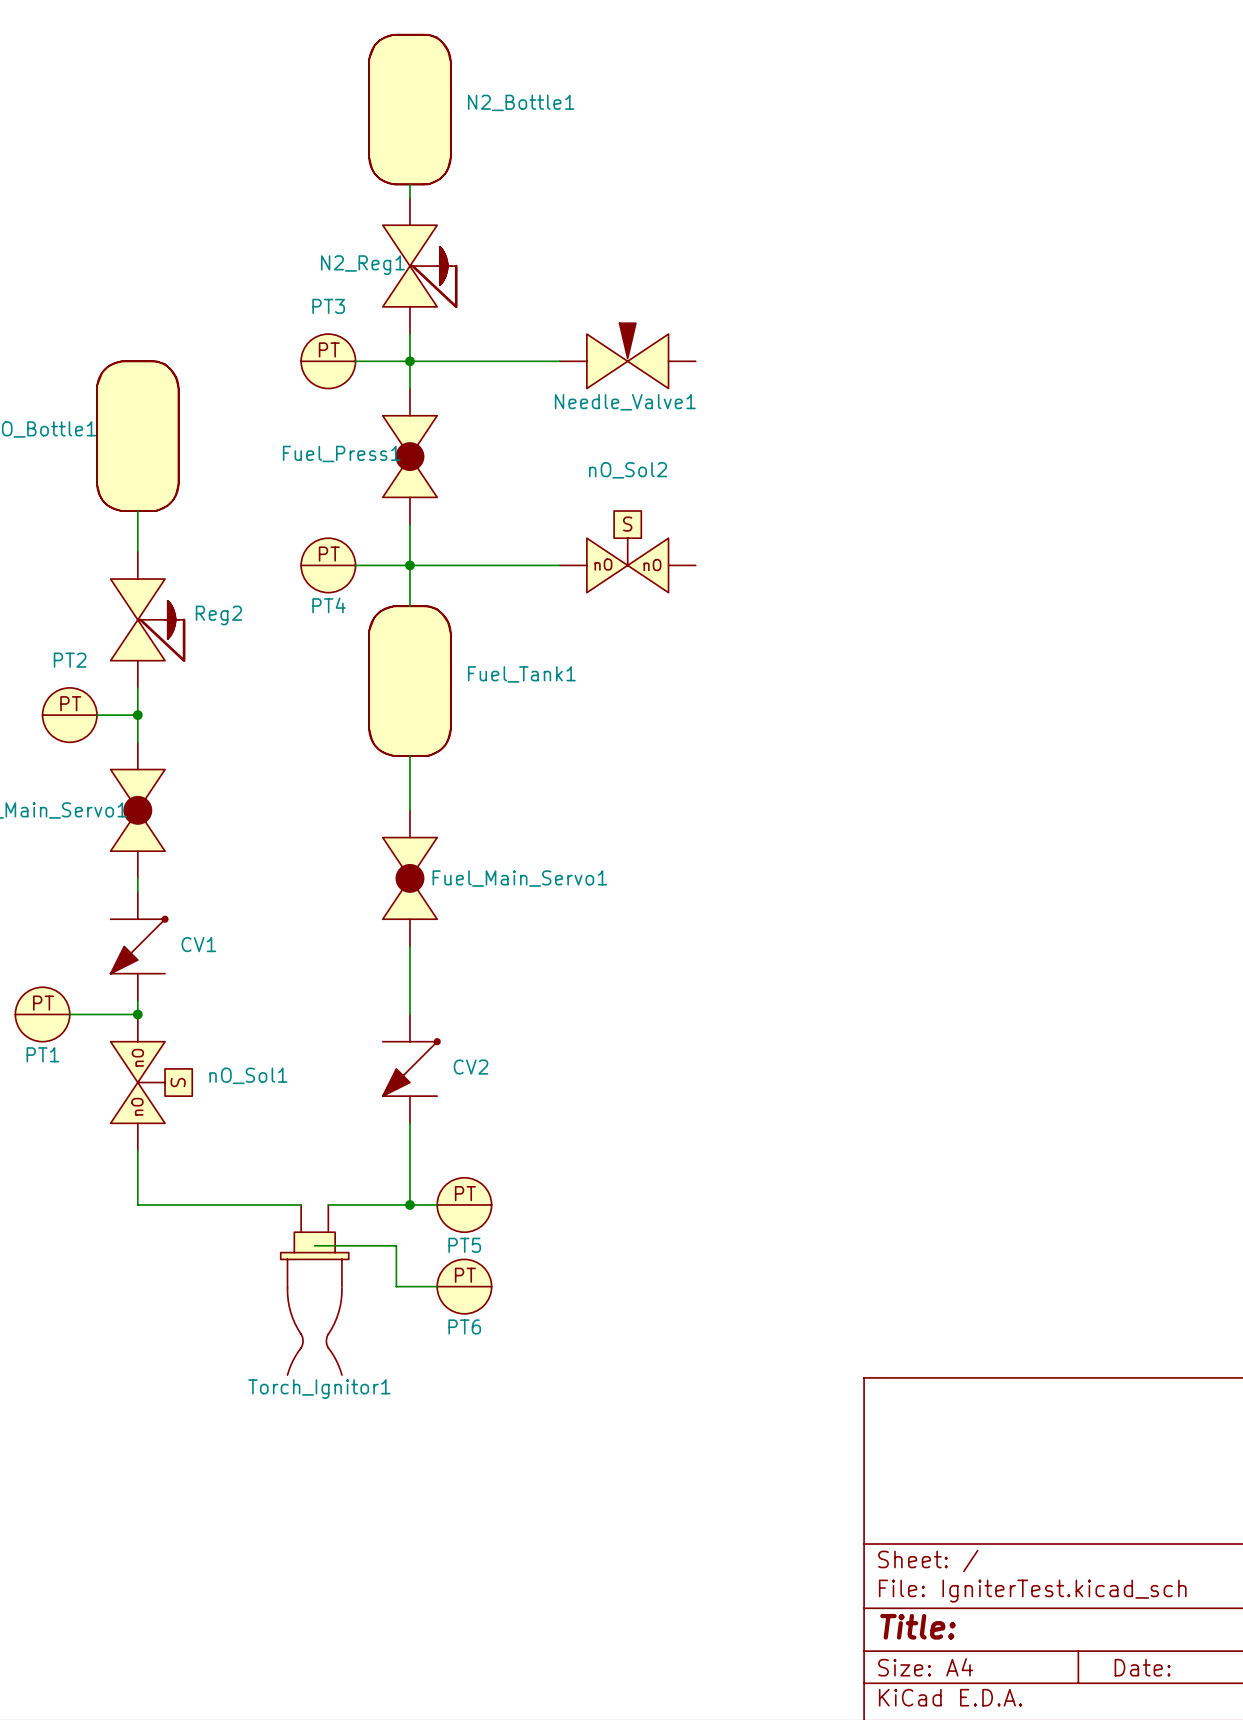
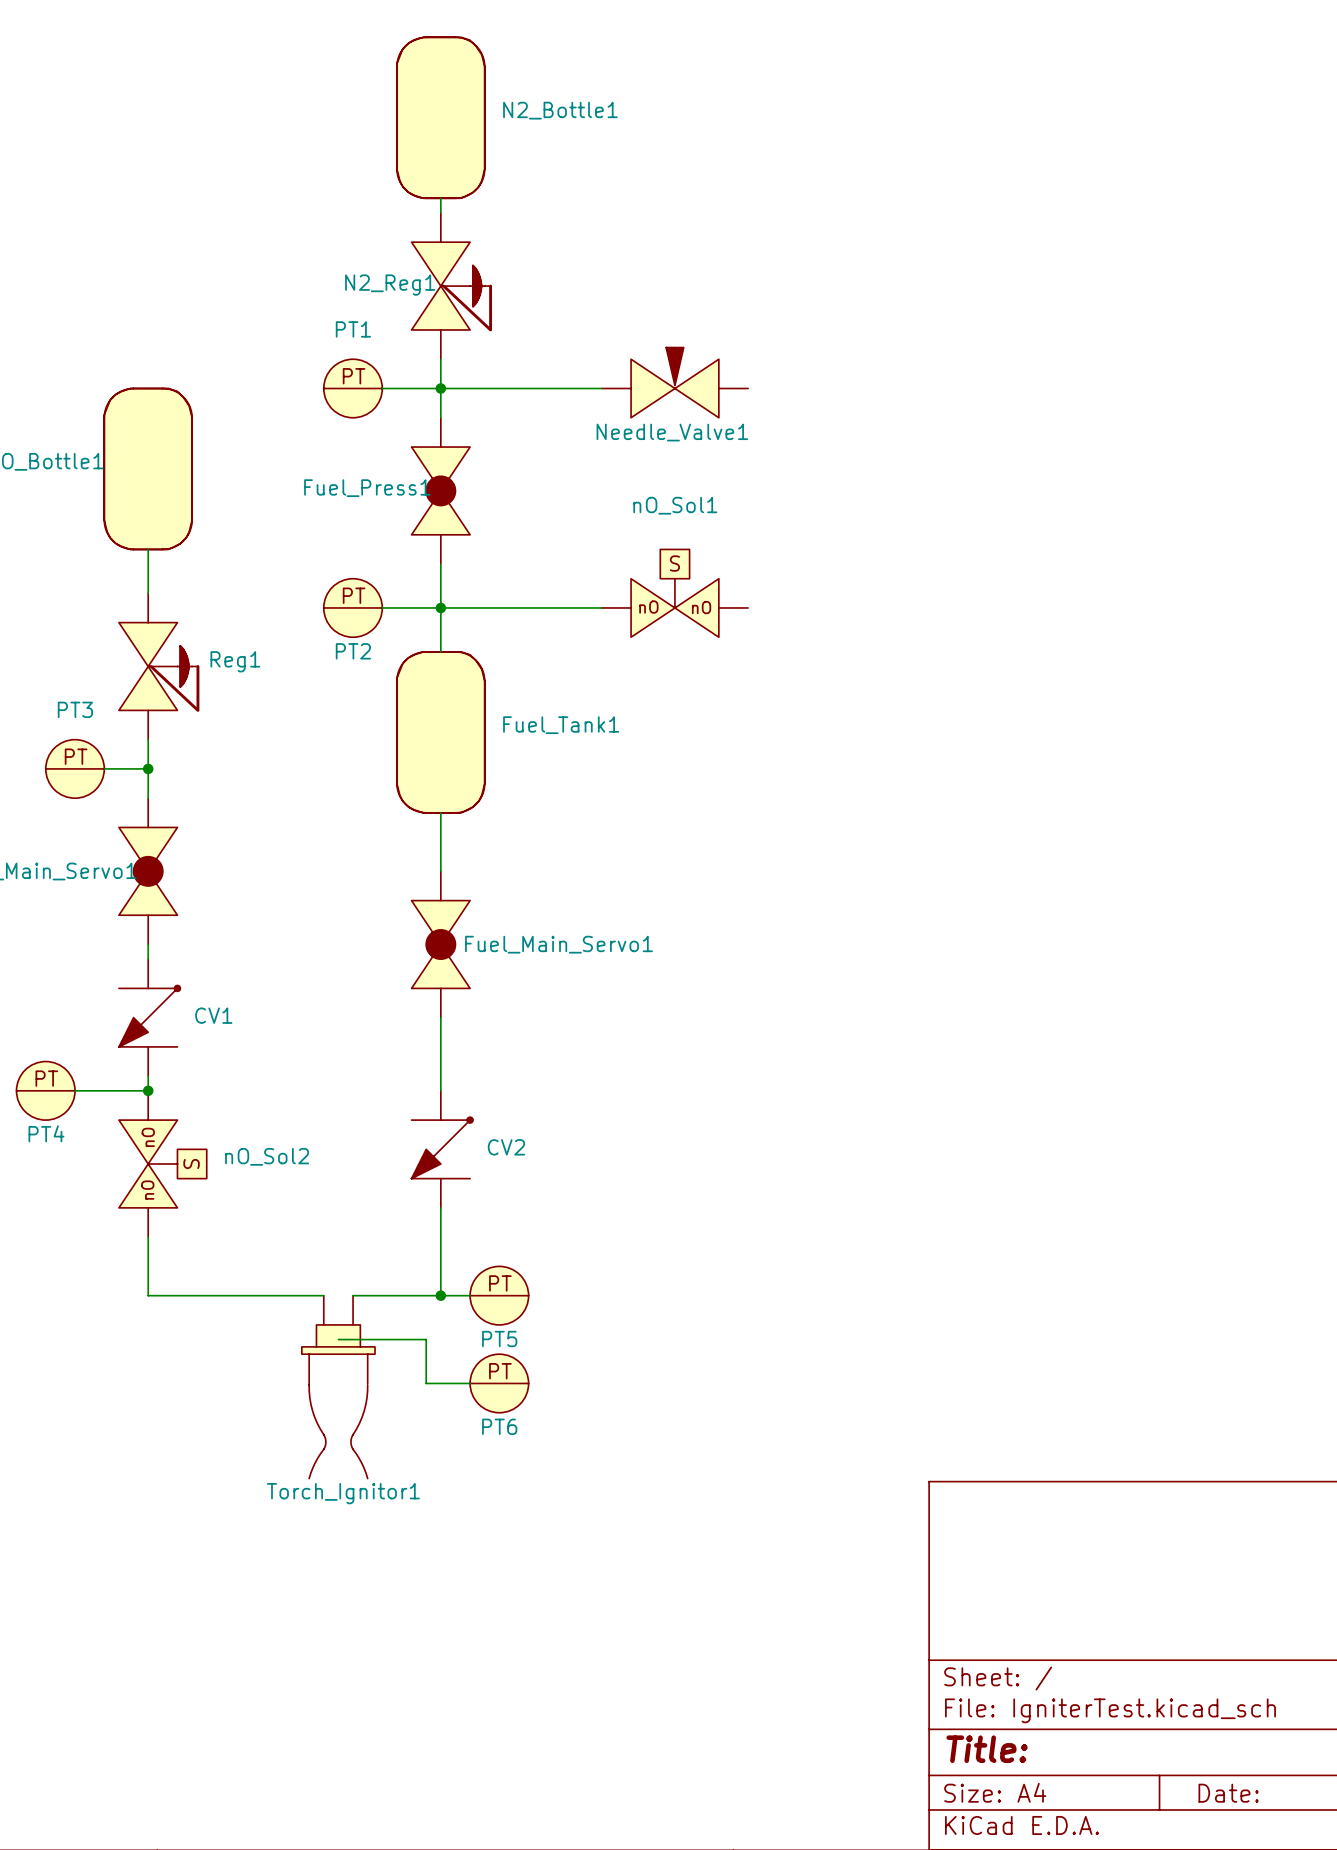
PT3 name: PT3 (328, 306) -> PT1 (353, 329)
nO_Sol2 name: nO_Sol2 (628, 470) -> nO_Sol1 (675, 505)
PT4 name: PT4 (328, 605) -> PT2 (353, 651)
Reg2 name: Reg2 (218, 615) -> Reg1 (235, 661)
PT2 name: PT2 (70, 660) -> PT3 (75, 709)
PT1 name: PT1 (42, 1054) -> PT4 (46, 1133)
nO_Sol1 name: nO_Sol1 (248, 1075) -> nO_Sol2 (267, 1156)

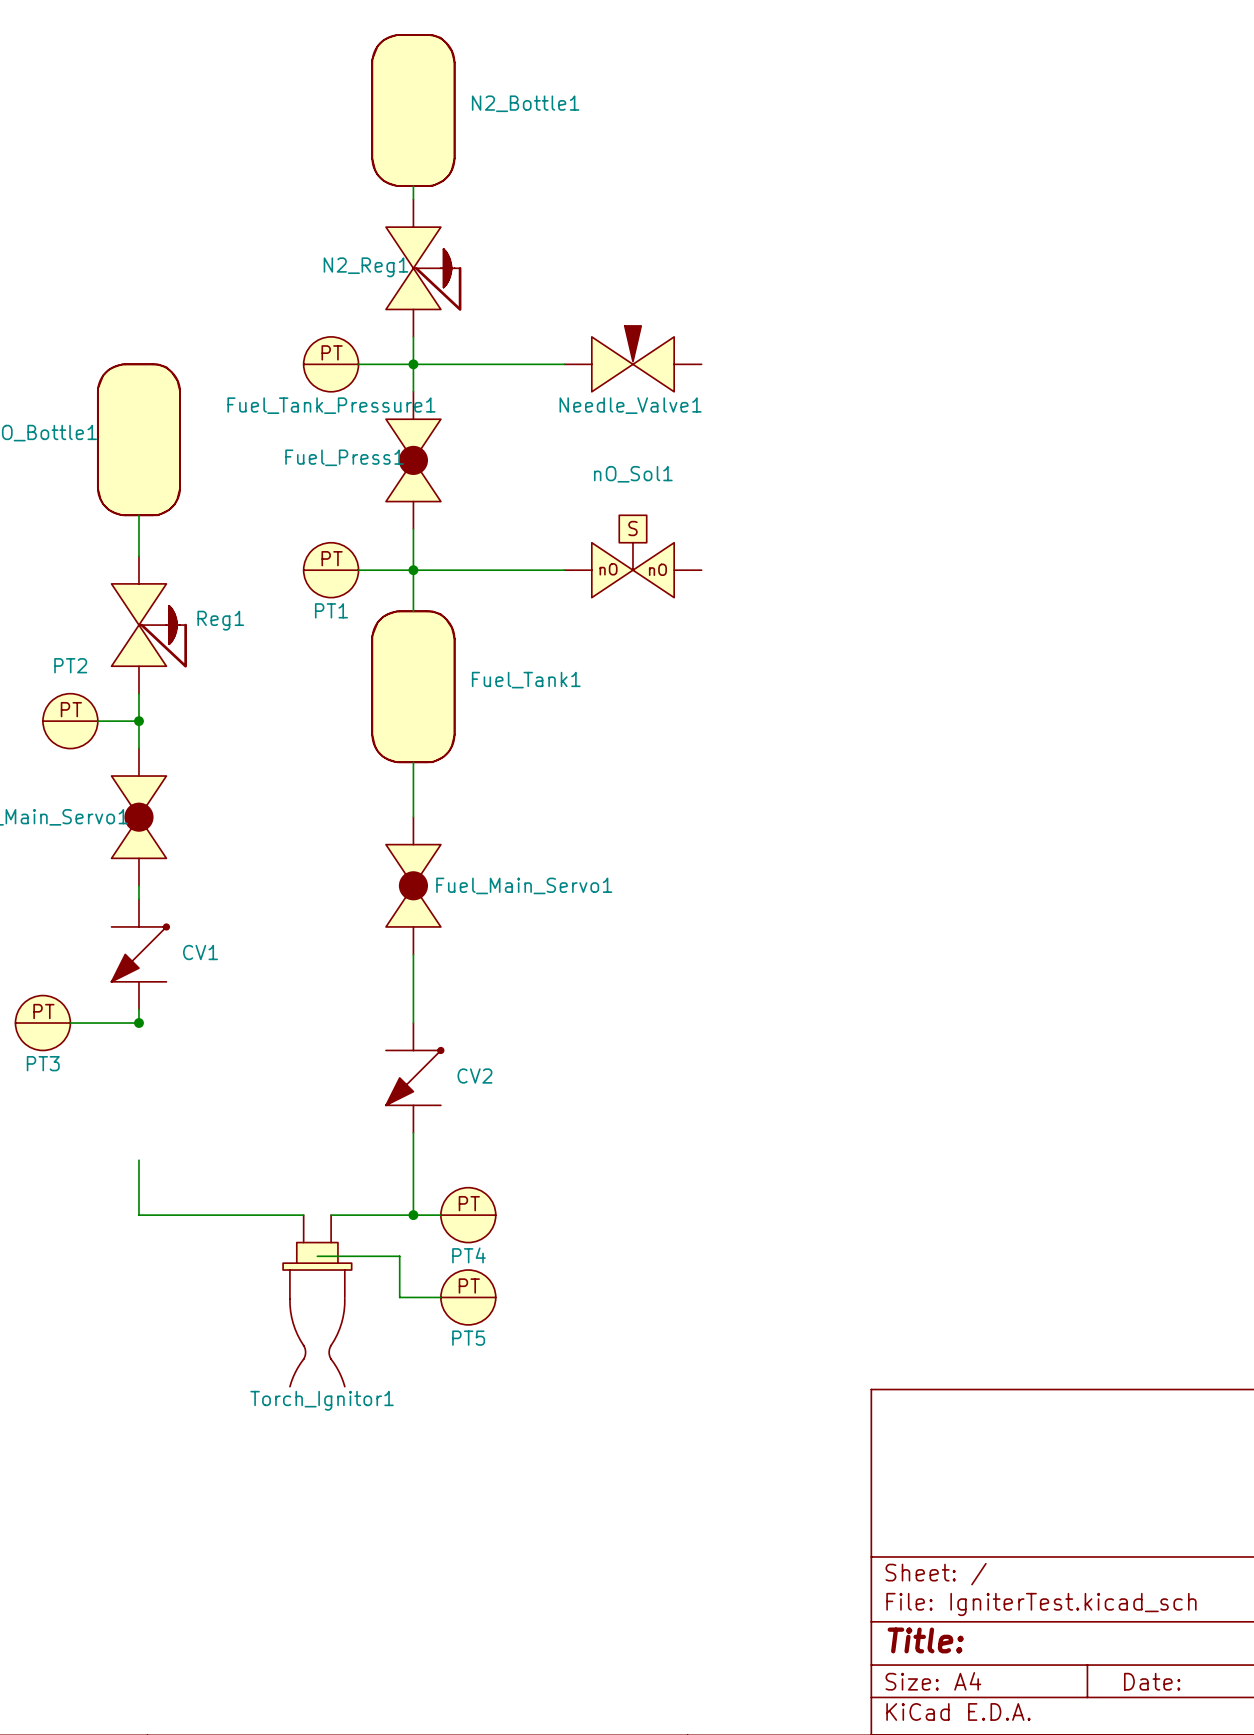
PT1 name: PT1 (353, 329) -> Fuel_Tank_Pressure1 (331, 405)
PT2 name: PT2 (353, 651) -> PT1 (331, 610)
PT3 name: PT3 (75, 709) -> PT2 (70, 665)
PT4 name: PT4 (46, 1133) -> PT3 (43, 1063)
nO_Sol2: (162, 1163) -> none
PT5 name: PT5 (499, 1339) -> PT4 (468, 1255)
PT6 name: PT6 (499, 1426) -> PT5 (468, 1338)

